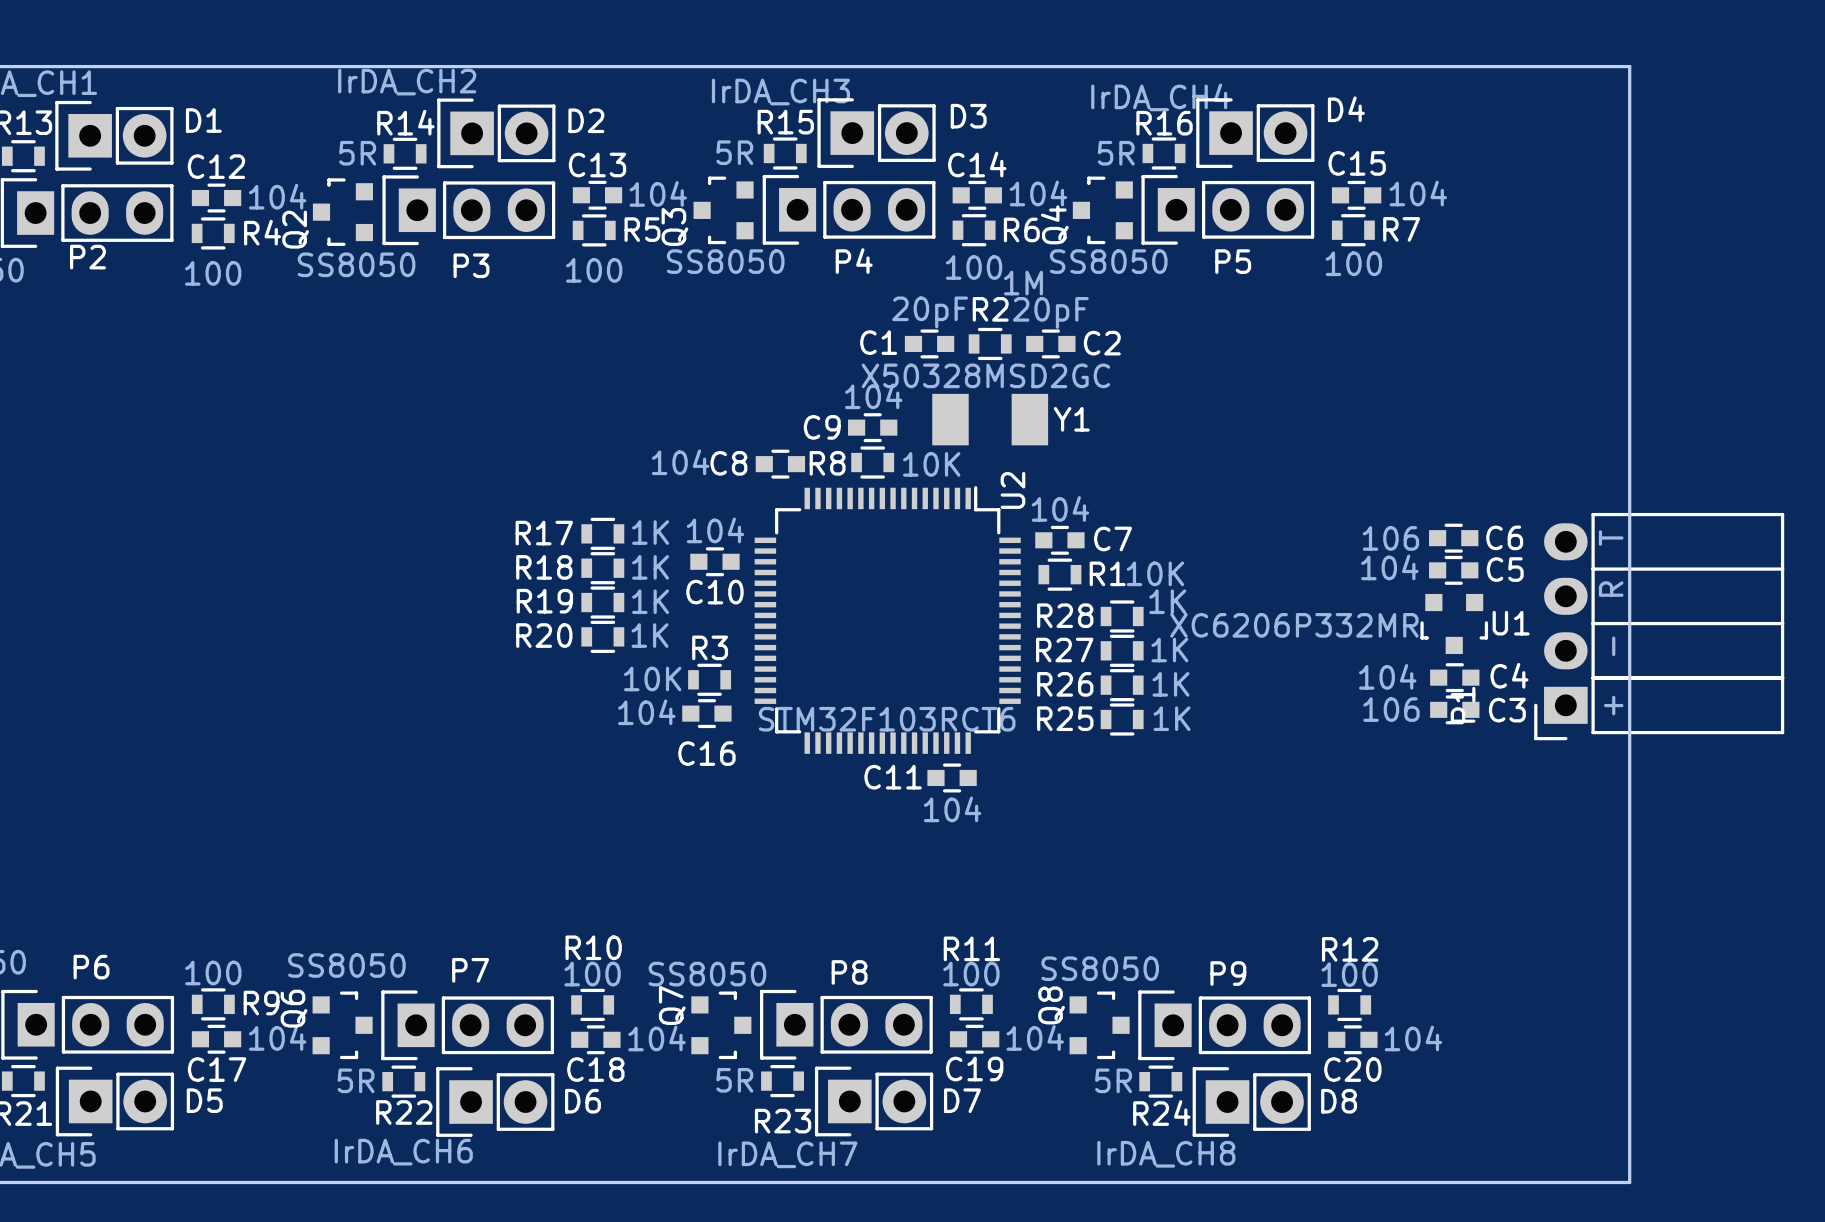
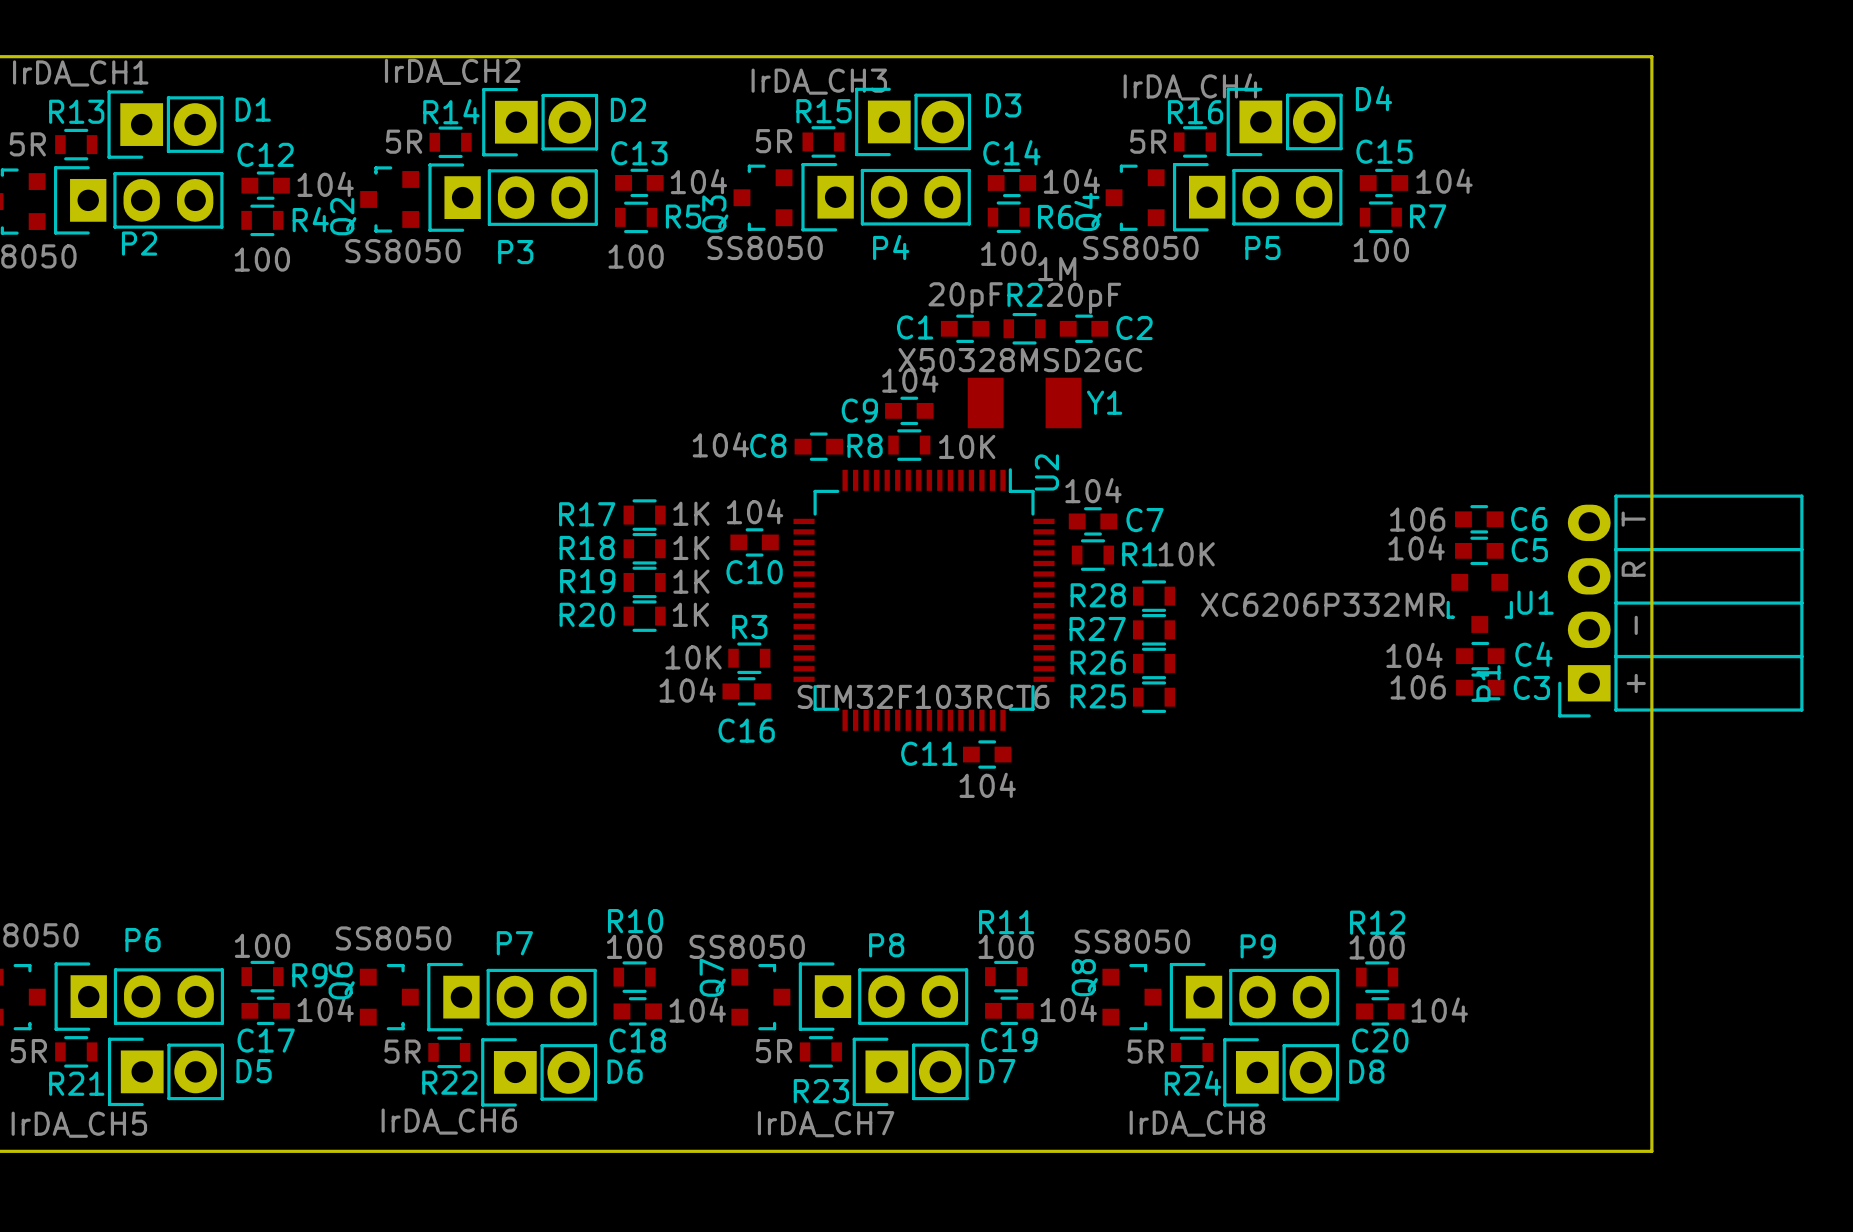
R28 value: 1K (1167, 601) -> none
R27 value: 1K (1169, 650) -> none
R26 value: 1K (1170, 684) -> none
R25 value: 1K (1172, 718) -> none

